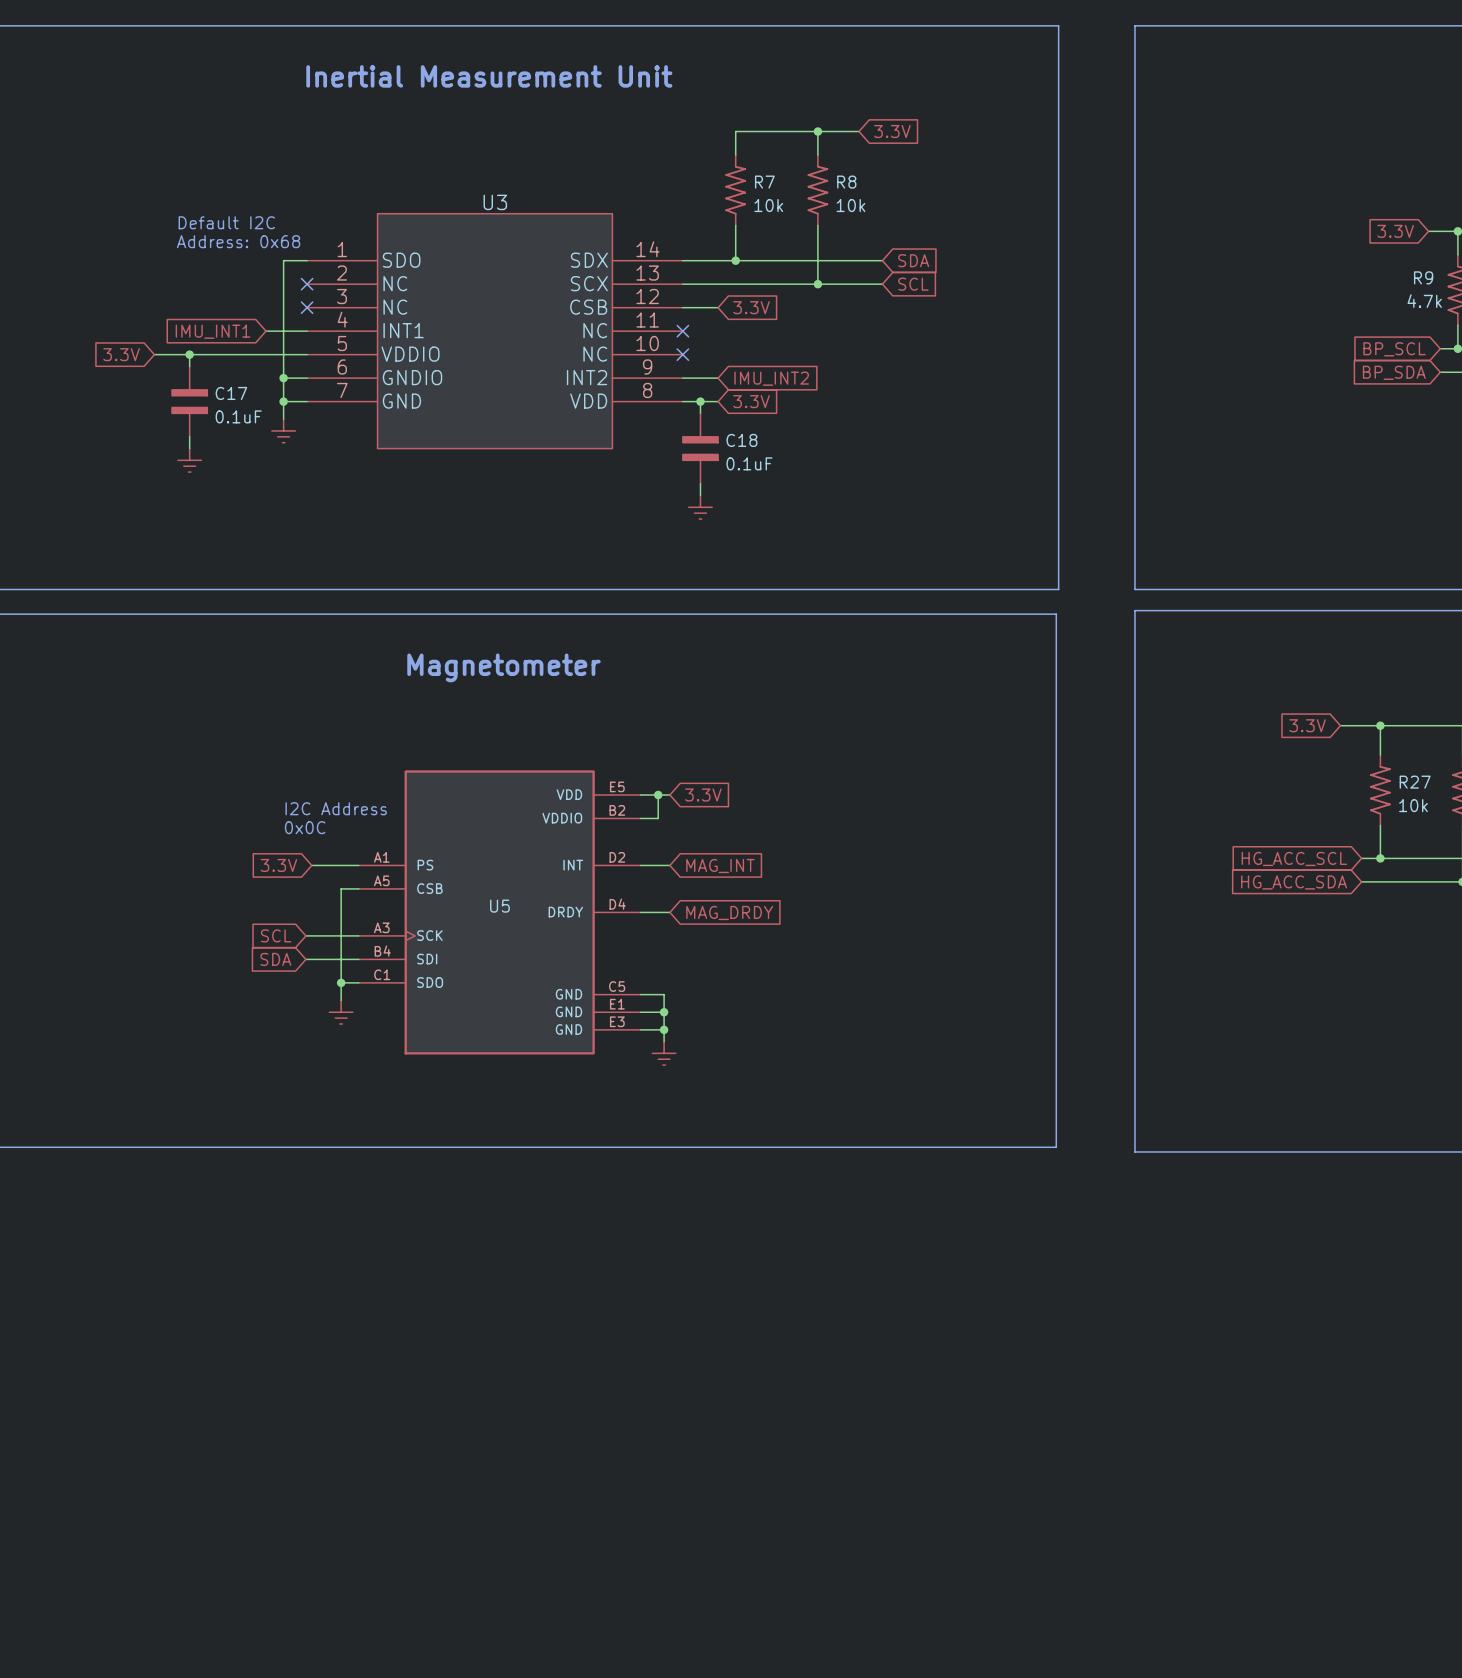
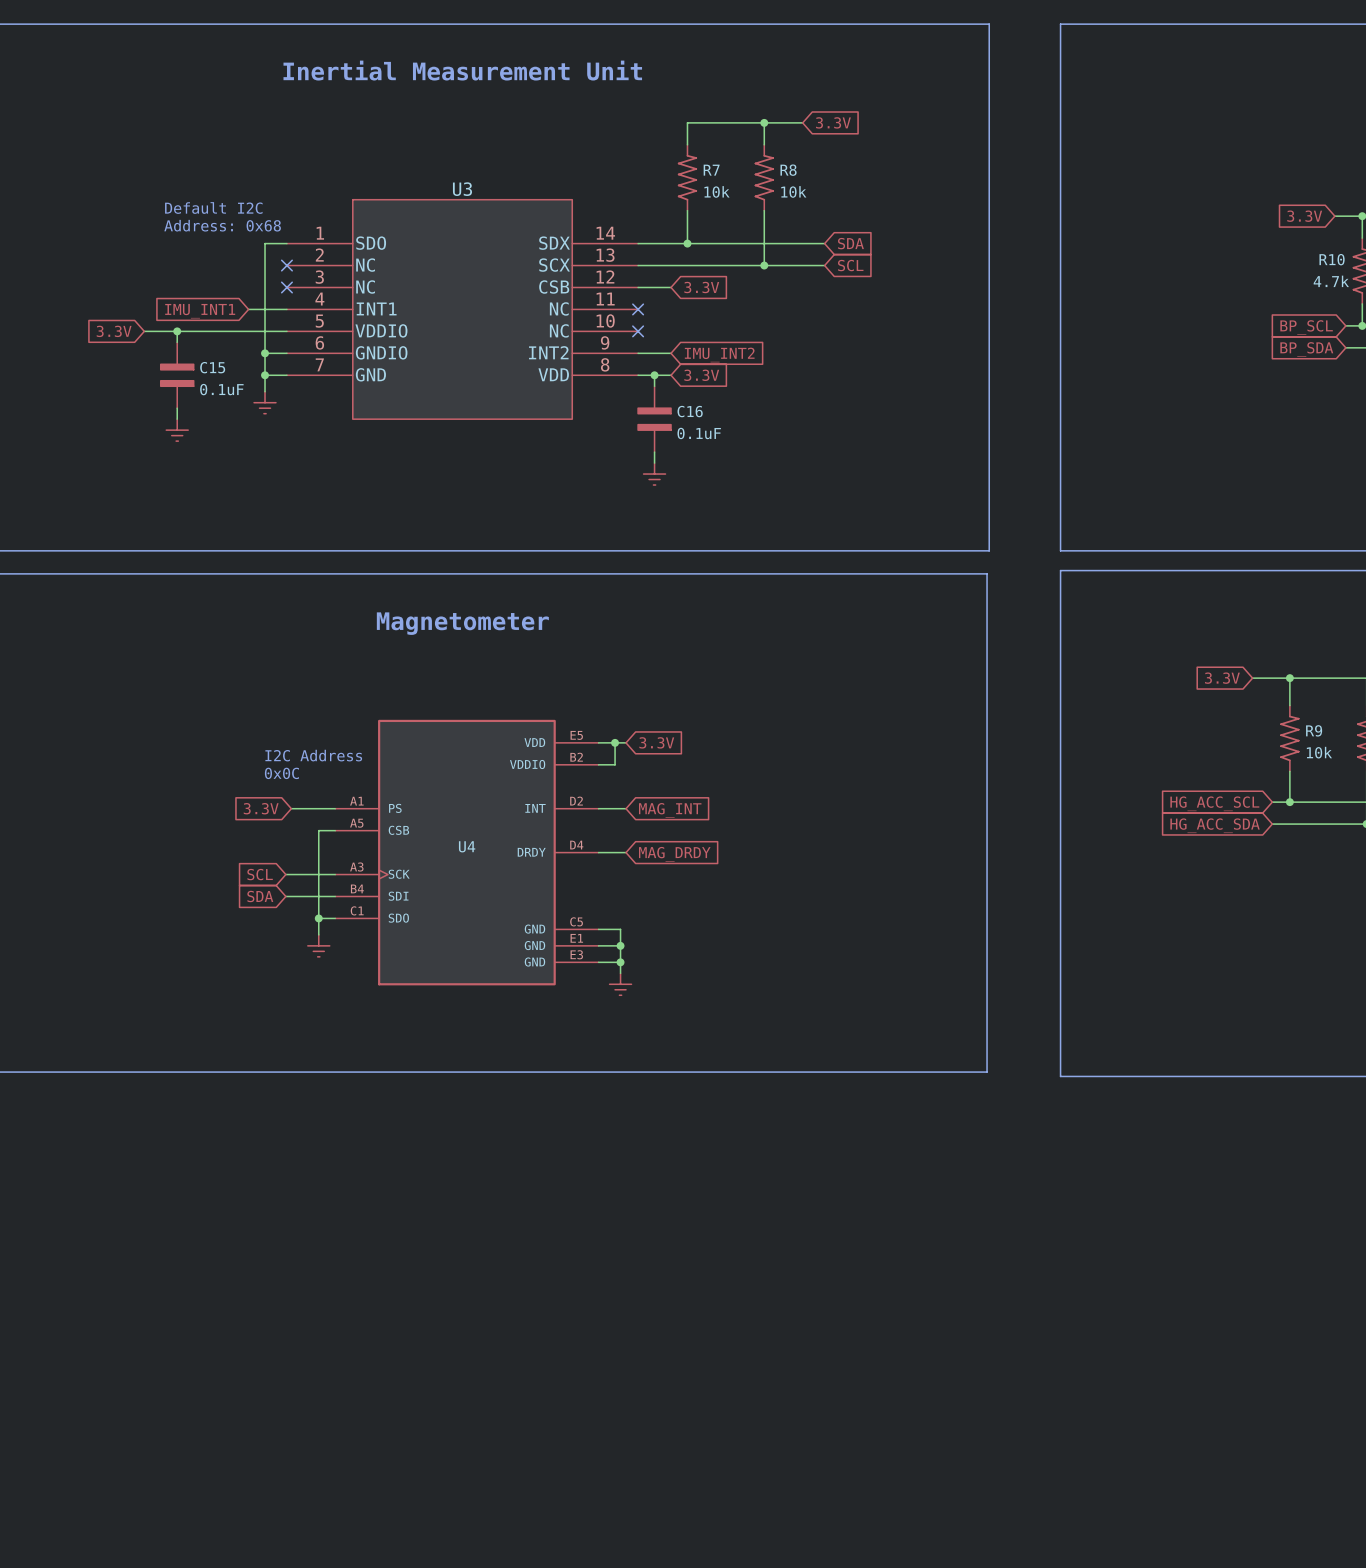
R9 name: R9 (1423, 277) -> R10 (1332, 259)
C17 name: C17 (231, 393) -> C15 (212, 367)
C18 name: C18 (741, 440) -> C16 (690, 411)
R27 name: R27 (1415, 782) -> R9 (1314, 730)
U5 name: U5 (499, 906) -> U4 (467, 846)

